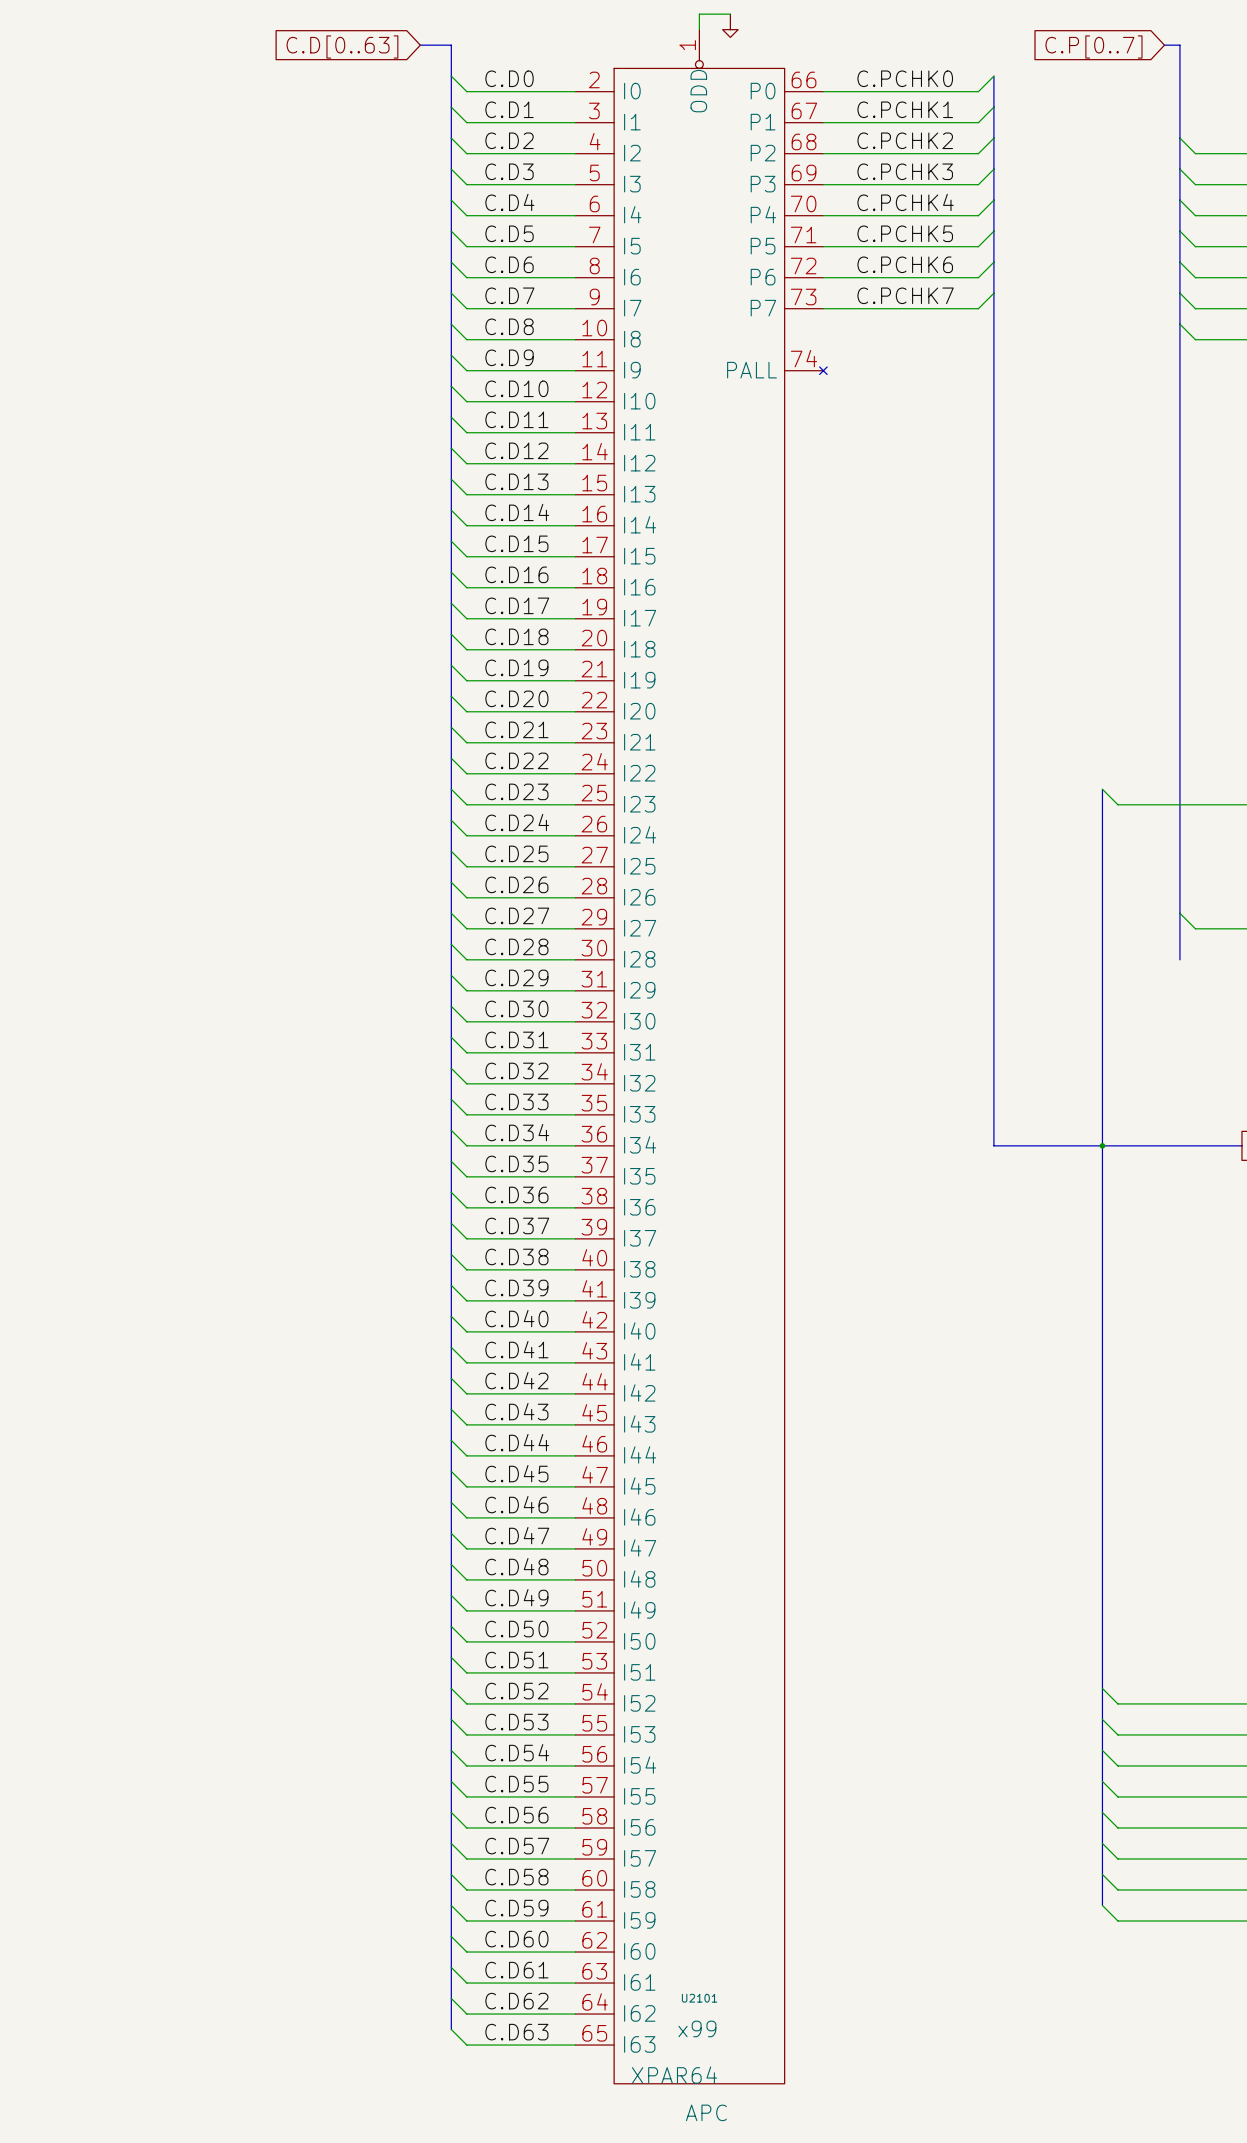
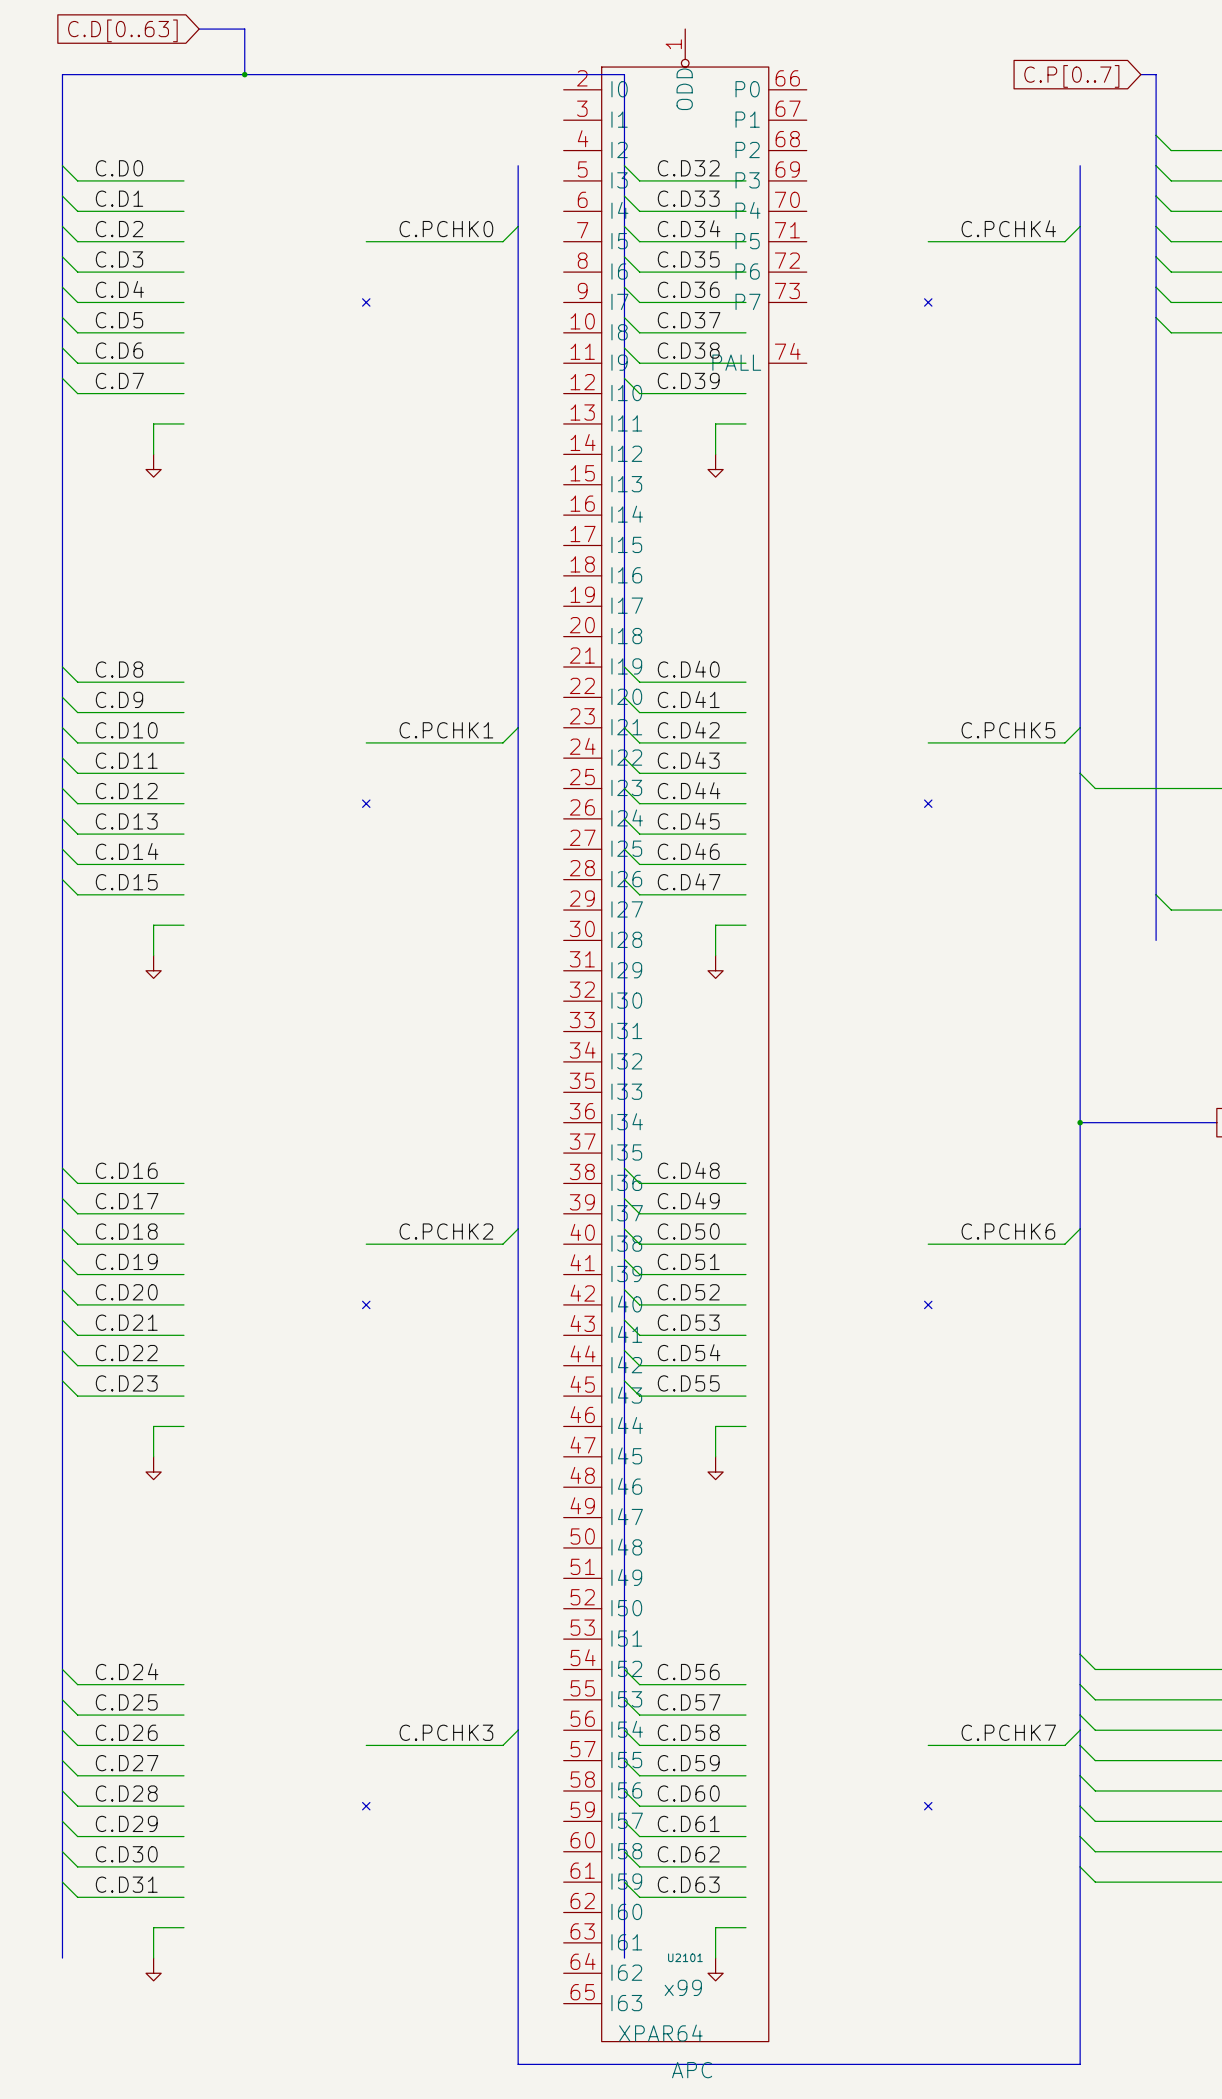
wire: (730, 14) (699, 14) (699, 29) -> none
power symbol: (730, 26) -> none
bus: none -> (199, 29) (244, 29) (244, 74)
global label: none -> C.D[0..63] (122, 30)
bus: (420, 45) (451, 45) (451, 2029) -> none
bus: (1164, 45) (1179, 45) (1179, 76) -> (1140, 74) (1156, 74)
global label: C.D[0..63] (342, 47) -> none
global label position: C.P[0..7] (1093, 47) -> C.P[0..7] (1071, 76)
junction: none -> (244, 74)
wire: (451, 76) (466, 91) (575, 91) -> none
bus: (993, 76) (993, 1145) (1102, 1145) -> none
wire: (993, 76) (978, 91) (823, 91) -> none
label: C.D0 (509, 78) -> none
label: C.PCHK0 (905, 78) -> none
wire: (451, 107) (466, 122) (575, 122) -> none
wire: (993, 107) (978, 122) (823, 122) -> none
label: C.D1 (509, 109) -> none
label: C.PCHK1 (905, 109) -> none
wire: (451, 138) (466, 153) (575, 153) -> none
wire: (993, 138) (978, 153) (823, 153) -> none
label: C.D2 (509, 140) -> none
label: C.PCHK2 (905, 140) -> none
wire: none -> (62, 165) (77, 180) (183, 180)
wire: (451, 169) (466, 184) (575, 184) -> none
bus: none -> (518, 165) (518, 2064) (1080, 2064) (1080, 1866)
wire: none -> (624, 165) (639, 180) (745, 180)
wire: (993, 169) (978, 184) (823, 184) -> none
bus: none -> (1080, 165) (1080, 773)
label: none -> C.D0 (119, 168)
label: C.D3 (509, 171) -> none
label: none -> C.D32 (688, 168)
label: C.PCHK3 (905, 171) -> none
wire: none -> (62, 196) (77, 211) (183, 211)
wire: (451, 200) (466, 215) (575, 215) -> none
wire: none -> (624, 196) (639, 211) (745, 211)
wire: (993, 200) (978, 215) (823, 215) -> none
label: none -> C.D1 (119, 198)
label: C.D4 (509, 202) -> none
label: none -> C.D33 (688, 198)
label position: C.PCHK4 (905, 202) -> C.PCHK4 (1008, 228)
wire: none -> (62, 226) (77, 241) (183, 241)
wire: (451, 231) (466, 246) -> (366, 241) (457, 241)
wire: none -> (624, 226) (639, 241) (745, 241)
wire: (993, 231) (978, 246) -> (1080, 226) (1064, 241) (958, 241)
label: none -> C.D2 (119, 229)
label: none -> C.PCHK0 (446, 229)
label: C.D5 (509, 233) -> none
label: none -> C.D34 (689, 228)
label: C.PCHK5 (905, 233) -> none
wire: (513, 246) (575, 246) -> (502, 241) (518, 226)
wire: (823, 246) (947, 246) -> none
wire: none -> (62, 256) (77, 272) (183, 272)
wire: (451, 262) (466, 277) (575, 277) -> none
wire: none -> (624, 256) (639, 272) (745, 272)
wire: (993, 262) (978, 277) (823, 277) -> none
label: none -> C.D3 (119, 259)
label: C.D6 (509, 264) -> none
label: none -> C.D35 (688, 259)
label: C.PCHK6 (905, 264) -> none
wire: none -> (62, 287) (77, 302) (183, 302)
wire: (451, 293) (466, 308) (575, 308) -> none
wire: none -> (624, 287) (639, 302) (745, 302)
wire: (993, 293) (978, 308) (823, 308) -> none
label: none -> C.D4 (119, 289)
label: C.D7 (509, 295) -> none
label: none -> C.D36 (688, 289)
label: C.PCHK7 (905, 295) -> none
no-connect mark: none -> (366, 302)
no-connect mark: none -> (928, 302)
wire: none -> (62, 317) (77, 332) (183, 332)
wire: (451, 324) (466, 339) (575, 339) -> none
wire: none -> (624, 317) (639, 332) (745, 332)
label: none -> C.D5 (119, 320)
label: C.D8 (509, 326) -> none
label: none -> C.D37 (689, 320)
wire: none -> (62, 348) (77, 363) (183, 363)
wire: (451, 355) (466, 370) (575, 370) -> none
wire: none -> (624, 348) (639, 363) (745, 363)
label: none -> C.D6 (119, 350)
label: C.D9 (509, 357) -> none
label: none -> C.D38 (688, 350)
no-connect mark: (823, 370) -> none
wire: none -> (62, 378) (77, 393) (183, 393)
wire: (451, 386) (466, 401) (575, 401) -> none
wire: none -> (624, 378) (639, 393) (745, 393)
label: none -> C.D7 (119, 380)
label: C.D10 (516, 388) -> none
label: none -> C.D39 (688, 380)
wire: (451, 417) (466, 432) (575, 432) -> none
label: C.D11 (516, 419) -> none
wire: none -> (183, 423) (153, 423) (153, 454)
wire: none -> (745, 423) (715, 423) (715, 454)
wire: (451, 448) (466, 463) (575, 463) -> none
label: C.D12 (516, 450) -> none
power symbol: none -> (153, 465)
power symbol: none -> (715, 465)
wire: (451, 479) (466, 494) (575, 494) -> none
label: C.D13 (516, 481) -> none
wire: (451, 510) (466, 525) (575, 525) -> none
label: C.D14 (517, 512) -> none
wire: (451, 541) (466, 556) (575, 556) -> none
label: C.D15 (516, 543) -> none
wire: (451, 572) (466, 587) (575, 587) -> none
label: C.D16 (516, 574) -> none
wire: (451, 603) (466, 618) (575, 618) -> none
label: C.D17 (517, 605) -> none
wire: (451, 634) (466, 649) (575, 649) -> none
label: C.D18 (516, 636) -> none
wire: (451, 665) (466, 680) (575, 680) -> none
label: C.D19 (516, 667) -> none
wire: none -> (62, 667) (77, 682) (183, 682)
wire: none -> (624, 667) (639, 682) (745, 682)
label: none -> C.D8 (119, 669)
label: none -> C.D40 (688, 669)
wire: (451, 696) (466, 711) (575, 711) -> none
label: C.D20 (516, 698) -> none
wire: none -> (62, 697) (77, 712) (183, 712)
wire: none -> (624, 697) (639, 712) (745, 712)
label: none -> C.D9 (119, 699)
label: none -> C.D41 (688, 699)
wire: (451, 727) (466, 742) (575, 742) -> none
label: C.D21 (516, 729) -> none
wire: none -> (62, 727) (77, 742) (183, 742)
wire: none -> (518, 727) (502, 742) (366, 742)
wire: none -> (624, 727) (639, 742) (745, 742)
wire: none -> (1080, 727) (1064, 742) (928, 742)
label: none -> C.D10 (126, 730)
label: none -> C.PCHK1 (446, 730)
label: none -> C.D42 (688, 729)
label: none -> C.PCHK5 (1008, 730)
wire: (451, 758) (466, 773) (575, 773) -> none
label: C.D22 (516, 760) -> none
wire: none -> (62, 758) (77, 773) (183, 773)
wire: none -> (624, 758) (639, 773) (745, 773)
label: none -> C.D11 (126, 760)
label: none -> C.D43 (688, 760)
wire: (451, 789) (466, 804) (575, 804) -> none
label: C.D23 (516, 791) -> none
wire: none -> (62, 788) (77, 803) (183, 803)
wire: none -> (624, 788) (639, 803) (745, 803)
label: none -> C.D12 (126, 791)
label: none -> C.D44 (689, 790)
no-connect mark: none -> (366, 803)
wire: (451, 820) (466, 835) (575, 835) -> none
no-connect mark: none -> (928, 803)
label: C.D24 (517, 822) -> none
wire: none -> (62, 818) (77, 834) (183, 834)
wire: none -> (624, 818) (639, 834) (745, 834)
label: none -> C.D13 (126, 821)
label: none -> C.D45 (688, 821)
wire: (451, 851) (466, 866) (575, 866) -> none
label: C.D25 (516, 853) -> none
wire: none -> (62, 849) (77, 864) (183, 864)
wire: none -> (624, 849) (639, 864) (745, 864)
label: none -> C.D14 (127, 851)
label: none -> C.D46 (688, 851)
wire: (451, 882) (466, 897) (575, 897) -> none
label: C.D26 (516, 884) -> none
wire: none -> (62, 879) (77, 894) (183, 894)
wire: none -> (624, 879) (639, 894) (745, 894)
label: none -> C.D15 (126, 882)
label: none -> C.D47 (689, 881)
wire: (451, 913) (466, 928) (575, 928) -> none
label: C.D27 (517, 915) -> none
wire: none -> (183, 925) (153, 925) (153, 955)
wire: (451, 944) (466, 959) (575, 959) -> none
wire: none -> (745, 925) (715, 925) (715, 955)
label: C.D28 (516, 946) -> none
wire: (451, 975) (466, 990) (575, 990) -> none
label: C.D29 (516, 977) -> none
power symbol: none -> (153, 967)
power symbol: none -> (715, 967)
wire: (451, 1006) (466, 1021) (575, 1021) -> none
label: C.D30 (516, 1008) -> none
wire: (451, 1037) (466, 1052) (575, 1052) -> none
label: C.D31 (516, 1039) -> none
wire: (451, 1068) (466, 1083) (575, 1083) -> none
label: C.D32 (516, 1070) -> none
wire: (451, 1099) (466, 1114) (575, 1114) -> none
label: C.D33 (516, 1101) -> none
wire: (451, 1130) (466, 1145) (575, 1145) -> none
label: C.D34 (517, 1132) -> none
wire: (451, 1161) (466, 1176) (575, 1176) -> none
label: C.D35 (516, 1163) -> none
wire: none -> (62, 1168) (77, 1183) (183, 1183)
wire: (451, 1192) (466, 1207) (575, 1207) -> none
wire: none -> (624, 1168) (639, 1183) (745, 1183)
label: none -> C.D16 (126, 1170)
label: C.D36 (516, 1194) -> none
label: none -> C.D48 (688, 1170)
wire: none -> (62, 1198) (77, 1213) (183, 1213)
wire: (451, 1223) (466, 1238) (575, 1238) -> none
wire: none -> (624, 1198) (639, 1213) (745, 1213)
label: none -> C.D17 (127, 1201)
label: C.D37 (517, 1225) -> none
label: none -> C.D49 (688, 1200)
wire: none -> (62, 1228) (77, 1244) (183, 1244)
wire: (451, 1254) (466, 1269) -> (366, 1244) (457, 1244)
wire: none -> (624, 1228) (639, 1244) (745, 1244)
wire: none -> (1080, 1228) (1064, 1244) (928, 1244)
label: none -> C.D18 (126, 1231)
label: none -> C.PCHK2 (446, 1231)
label: C.D38 (516, 1256) -> none
label: none -> C.D50 (688, 1231)
label: none -> C.PCHK6 (1008, 1231)
wire: (513, 1269) (575, 1269) -> (502, 1244) (518, 1228)
wire: none -> (62, 1259) (77, 1274) (183, 1274)
wire: (451, 1285) (466, 1300) (575, 1300) -> none
wire: none -> (624, 1259) (639, 1274) (745, 1274)
label: none -> C.D19 (126, 1261)
label: C.D39 (516, 1287) -> none
label: none -> C.D51 (688, 1261)
wire: none -> (62, 1289) (77, 1304) (183, 1304)
wire: (451, 1316) (466, 1331) (575, 1331) -> none
wire: none -> (624, 1289) (639, 1304) (745, 1304)
label: none -> C.D20 (126, 1292)
label: C.D40 (516, 1318) -> none
label: none -> C.D52 (688, 1292)
no-connect mark: none -> (366, 1304)
no-connect mark: none -> (928, 1304)
wire: none -> (62, 1320) (77, 1335) (183, 1335)
wire: (451, 1347) (466, 1362) (575, 1362) -> none
wire: none -> (624, 1320) (639, 1335) (745, 1335)
label: none -> C.D21 (126, 1322)
label: C.D41 (516, 1349) -> none
label: none -> C.D53 (688, 1322)
wire: none -> (62, 1350) (77, 1365) (183, 1365)
wire: (451, 1378) (466, 1393) (575, 1393) -> none
wire: none -> (624, 1350) (639, 1365) (745, 1365)
label: C.D42 (516, 1380) -> none
label: none -> C.D54 (689, 1352)
label: none -> C.D22 (126, 1353)
wire: none -> (62, 1380) (77, 1396) (183, 1396)
wire: (451, 1409) (466, 1424) (575, 1424) -> none
wire: none -> (624, 1380) (639, 1396) (745, 1396)
label: C.D43 (516, 1411) -> none
label: none -> C.D23 (126, 1383)
label: none -> C.D55 (688, 1383)
wire: (451, 1440) (466, 1455) (575, 1455) -> none
label: C.D44 (517, 1442) -> none
wire: none -> (183, 1426) (153, 1426) (153, 1456)
wire: none -> (745, 1426) (715, 1426) (715, 1456)
wire: (451, 1471) (466, 1486) (575, 1486) -> none
label: C.D45 (516, 1473) -> none
power symbol: none -> (153, 1468)
power symbol: none -> (715, 1468)
wire: (451, 1502) (466, 1517) (575, 1517) -> none
label: C.D46 (516, 1504) -> none
wire: (451, 1533) (466, 1548) (575, 1548) -> none
label: C.D47 (517, 1535) -> none
wire: (451, 1564) (466, 1579) (575, 1579) -> none
label: C.D48 (516, 1566) -> none
wire: (451, 1595) (466, 1610) (575, 1610) -> none
label: C.D49 (516, 1597) -> none
wire: (451, 1626) (466, 1641) (575, 1641) -> none
label: C.D50 (516, 1629) -> none
wire: (451, 1657) (466, 1672) (575, 1672) -> none
label: C.D51 (516, 1660) -> none
wire: (451, 1688) (466, 1703) (575, 1703) -> none
label: C.D52 (516, 1691) -> none
wire: none -> (62, 1669) (77, 1684) (183, 1684)
wire: none -> (624, 1669) (639, 1684) (745, 1684)
label: none -> C.D24 (127, 1671)
label: none -> C.D56 (688, 1672)
wire: (451, 1719) (466, 1734) (575, 1734) -> none
label: C.D53 (516, 1722) -> none
wire: none -> (62, 1699) (77, 1715) (183, 1715)
wire: none -> (624, 1699) (639, 1715) (745, 1715)
label: none -> C.D25 (126, 1702)
label: none -> C.D57 (689, 1702)
wire: (451, 1750) (466, 1765) (575, 1765) -> none
label: C.D54 (517, 1752) -> none
wire: none -> (62, 1730) (77, 1745) (183, 1745)
wire: none -> (518, 1730) (502, 1745) (366, 1745)
wire: none -> (624, 1730) (639, 1745) (745, 1745)
wire: none -> (1080, 1730) (1064, 1745) (928, 1745)
label: none -> C.D26 (126, 1732)
label: none -> C.PCHK3 (446, 1732)
label: none -> C.D58 (688, 1732)
label: none -> C.PCHK7 (1008, 1732)
wire: (451, 1781) (466, 1796) (575, 1796) -> none
label: C.D55 (516, 1784) -> none
wire: none -> (62, 1760) (77, 1775) (183, 1775)
wire: none -> (624, 1760) (639, 1775) (745, 1775)
label: none -> C.D27 (127, 1763)
label: none -> C.D59 (688, 1763)
wire: (451, 1812) (466, 1827) (575, 1827) -> none
label: C.D56 (516, 1815) -> none
wire: none -> (62, 1790) (77, 1806) (183, 1806)
wire: none -> (624, 1790) (639, 1806) (745, 1806)
label: none -> C.D28 (126, 1793)
label: none -> C.D60 (688, 1793)
no-connect mark: none -> (366, 1806)
wire: (451, 1843) (466, 1858) (575, 1858) -> none
no-connect mark: none -> (928, 1806)
label: C.D57 (517, 1846) -> none
wire: none -> (62, 1821) (77, 1836) (183, 1836)
wire: none -> (624, 1821) (639, 1836) (745, 1836)
label: none -> C.D29 (126, 1823)
label: none -> C.D61 (688, 1823)
wire: (451, 1874) (466, 1889) (575, 1889) -> none
label: C.D58 (516, 1877) -> none
wire: none -> (62, 1851) (77, 1866) (183, 1866)
wire: none -> (624, 1851) (639, 1866) (745, 1866)
label: none -> C.D30 (126, 1854)
label: none -> C.D62 (688, 1854)
wire: (451, 1905) (466, 1921) (575, 1921) -> none
label: C.D59 (516, 1908) -> none
wire: none -> (62, 1882) (77, 1897) (183, 1897)
wire: none -> (624, 1882) (639, 1897) (745, 1897)
label: none -> C.D31 (126, 1884)
label: none -> C.D63 (688, 1884)
wire: (451, 1936) (466, 1952) (575, 1952) -> none
label: C.D60 (516, 1939) -> none
wire: none -> (183, 1927) (153, 1927) (153, 1958)
wire: (451, 1967) (466, 1983) (575, 1983) -> none
wire: none -> (745, 1927) (715, 1927) (715, 1958)
label: C.D61 (516, 1970) -> none
bus: none -> (62, 1958) (62, 74) (624, 74) (624, 1958)
wire: (451, 1998) (466, 2014) (575, 2014) -> none
label: C.D62 (516, 2001) -> none
power symbol: none -> (153, 1969)
power symbol: none -> (715, 1969)
wire: (451, 2029) (466, 2045) (575, 2045) -> none
label: C.D63 (516, 2032) -> none

